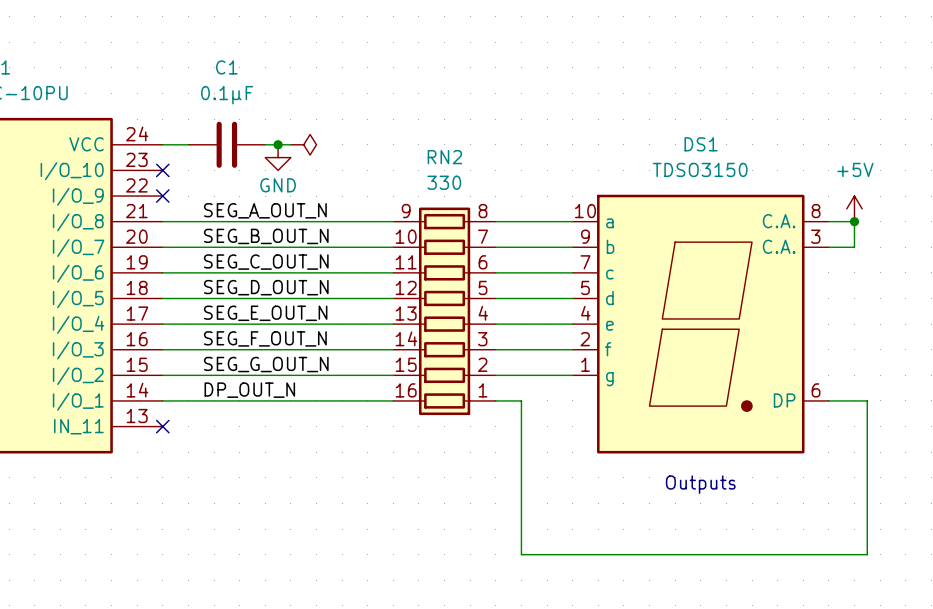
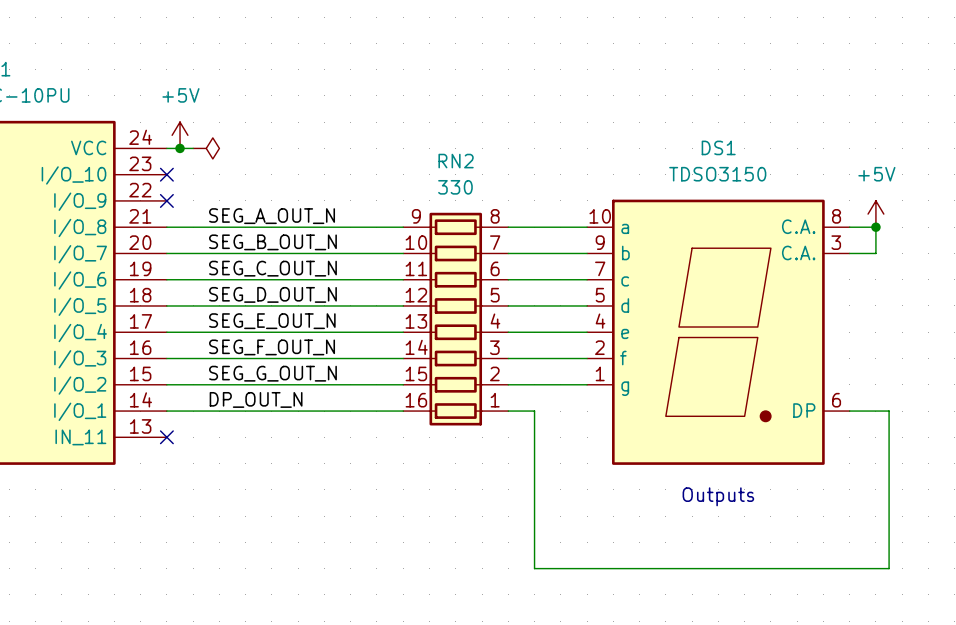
power symbol: none -> +5V (180, 135)
junction: none -> (180, 148)
C1: 0.1µF (226, 144) -> none
wire: (265, 144) (290, 144) -> none
junction: (278, 144) -> none
power symbol position: (303, 144) -> (206, 148)
power symbol: GND (278, 157) -> none

